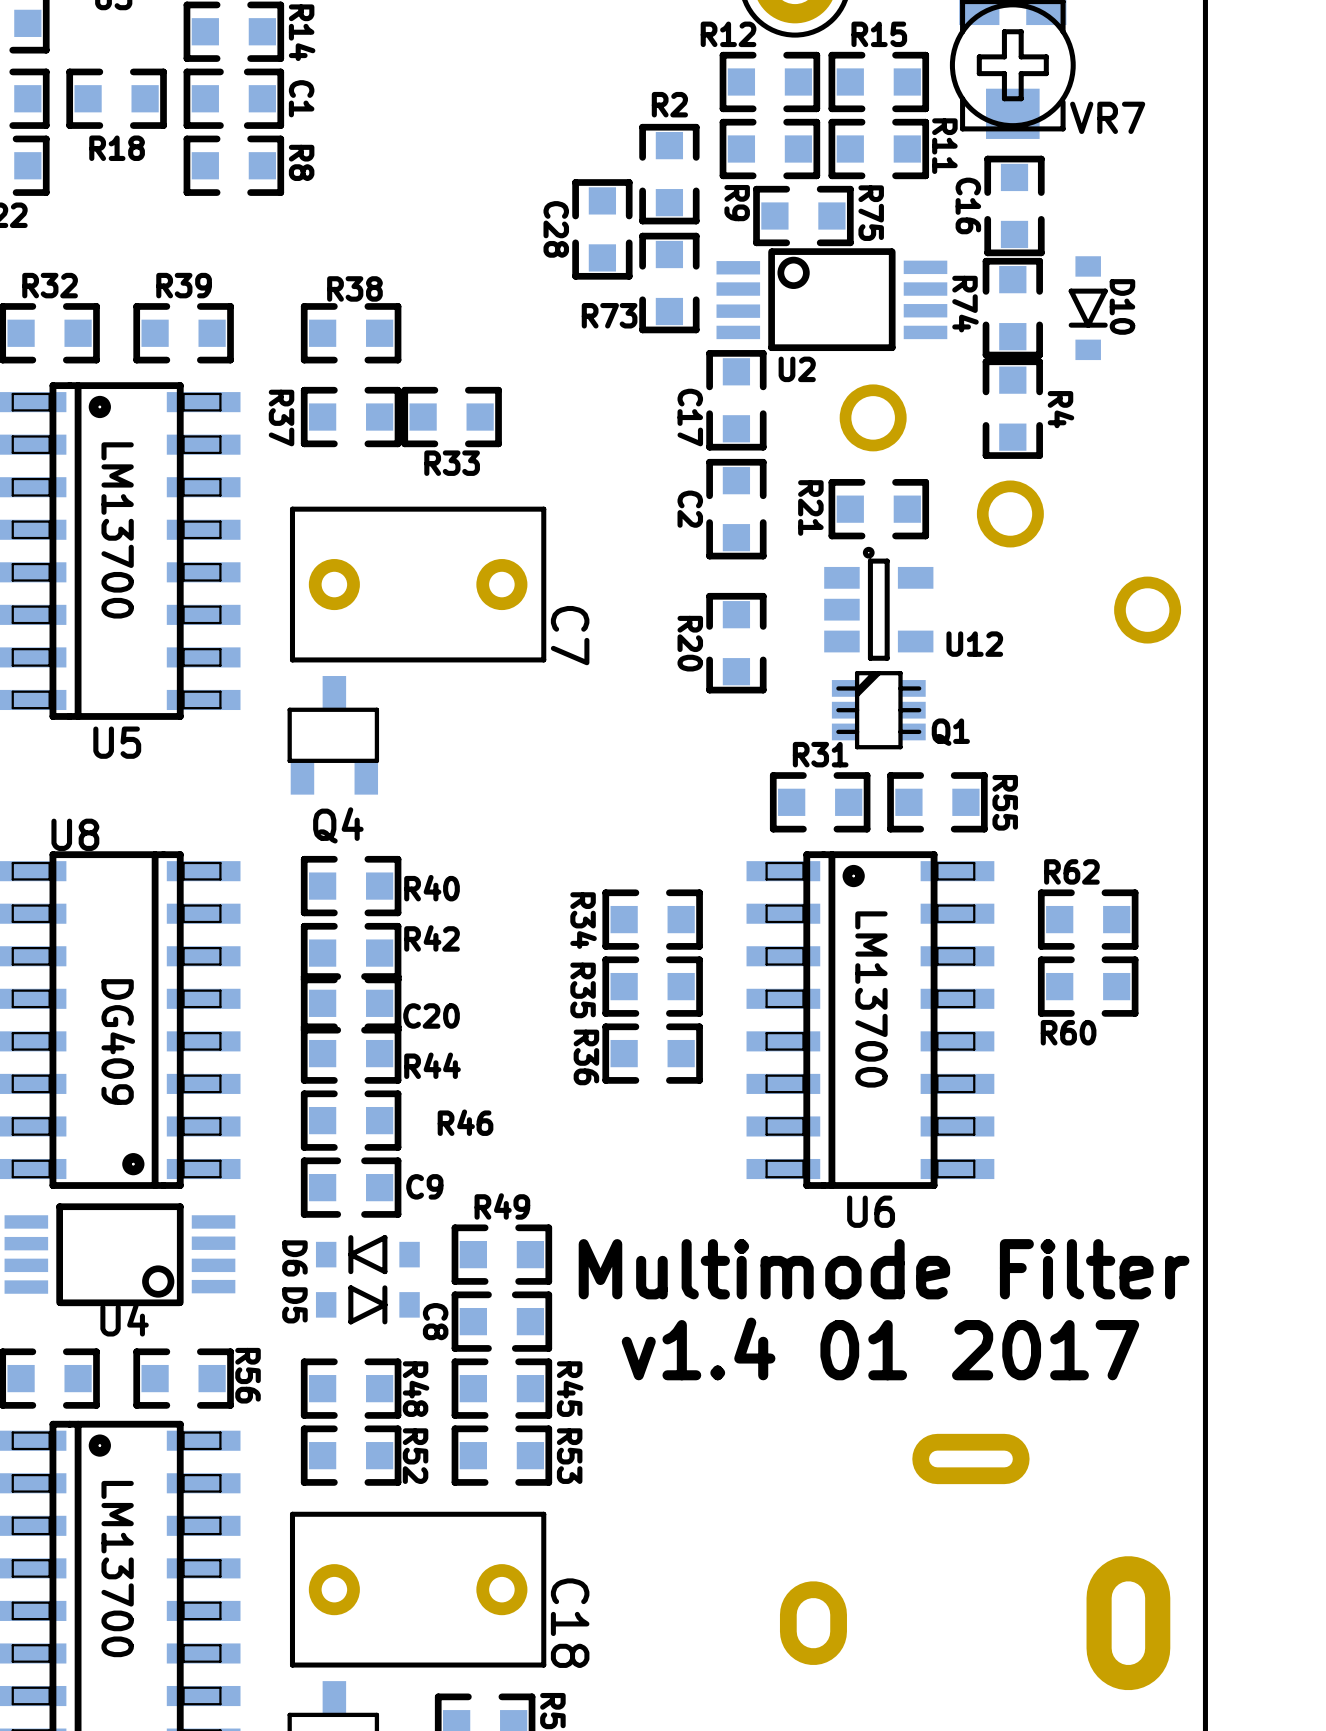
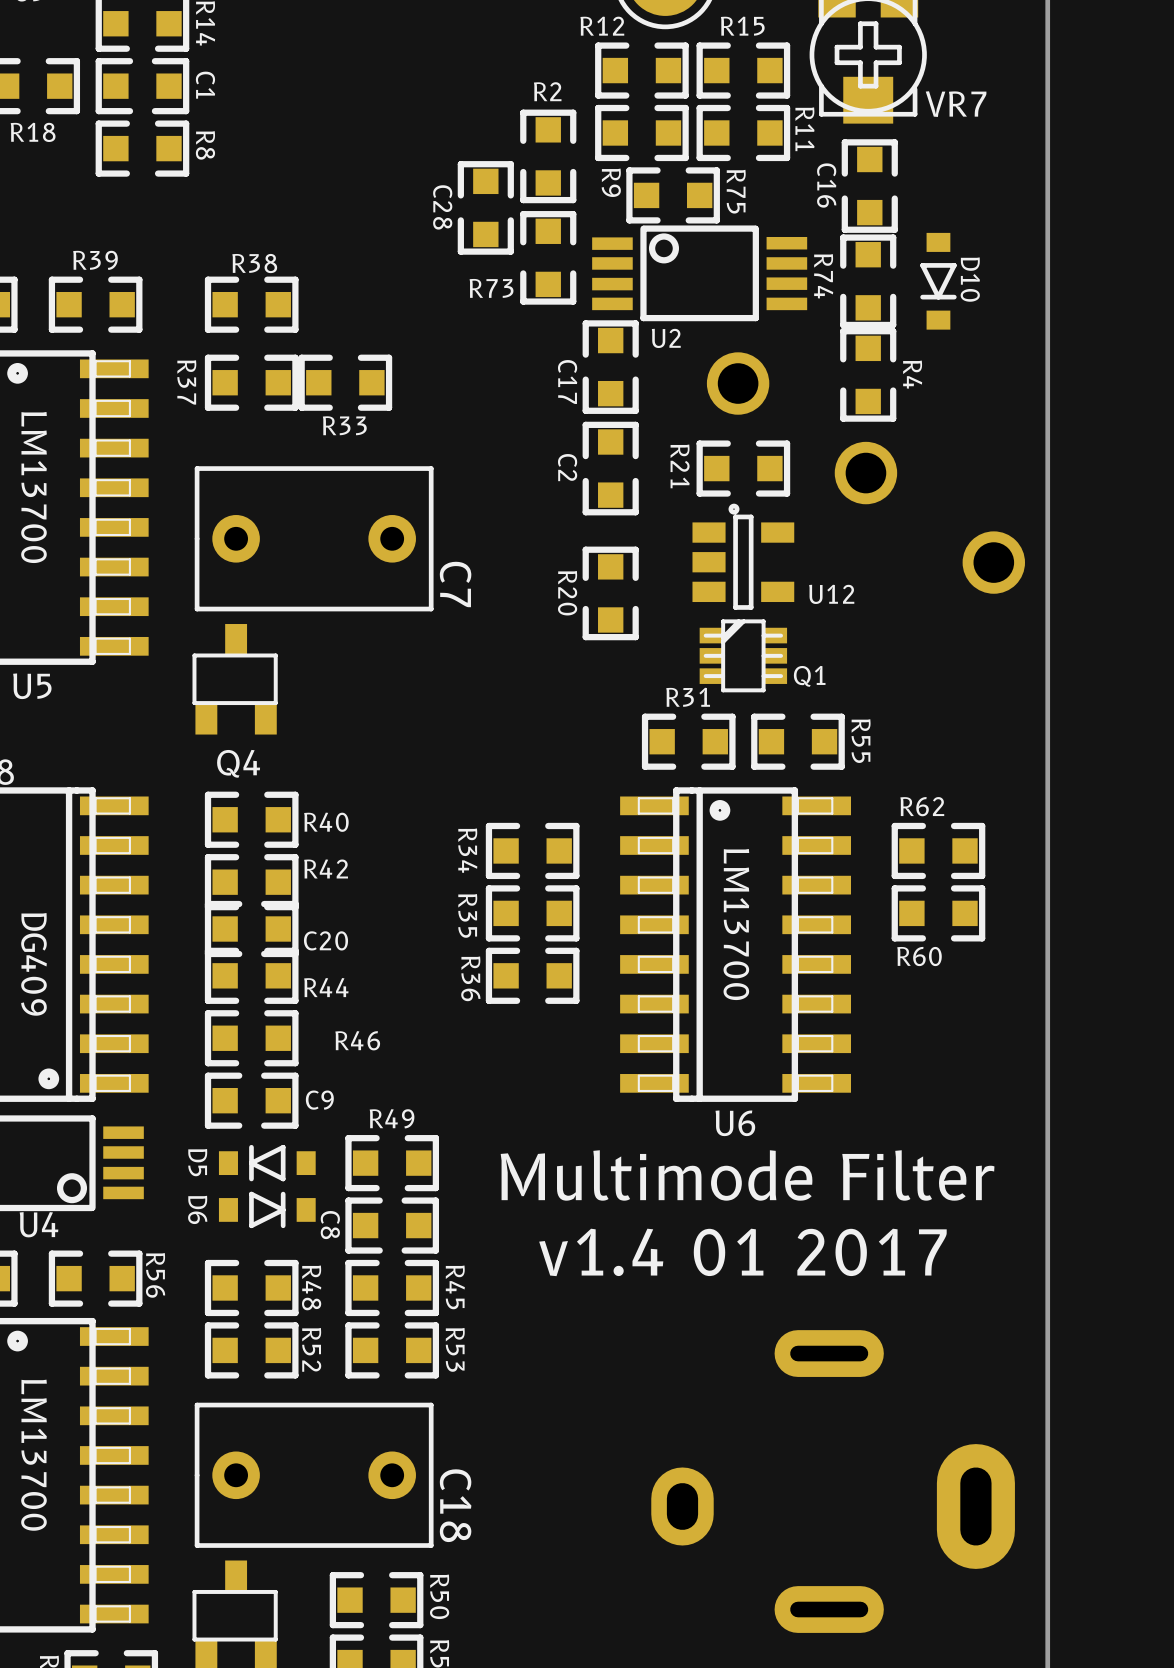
D6 name position: D6 (294, 1258) -> D6 (197, 1209)
D5 name position: D5 (294, 1305) -> D5 (197, 1162)

